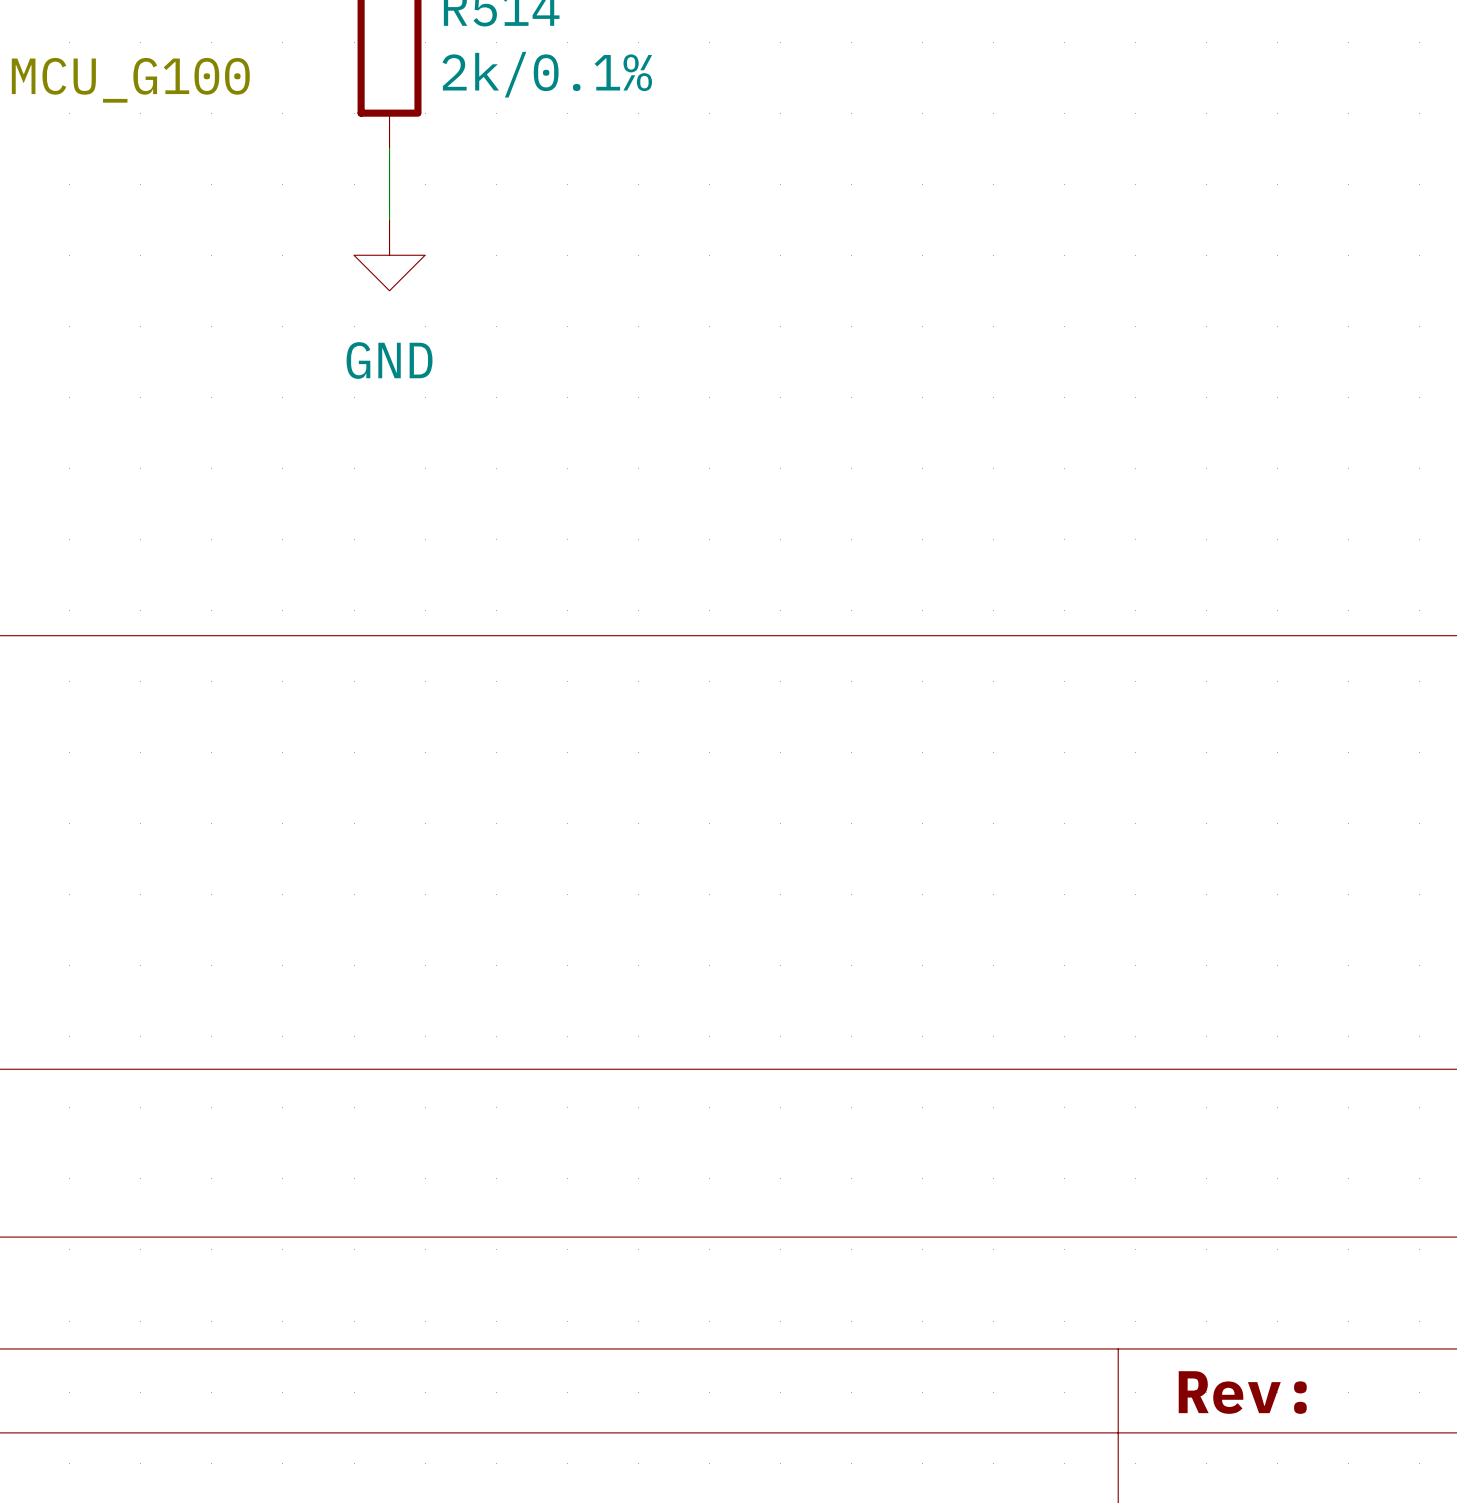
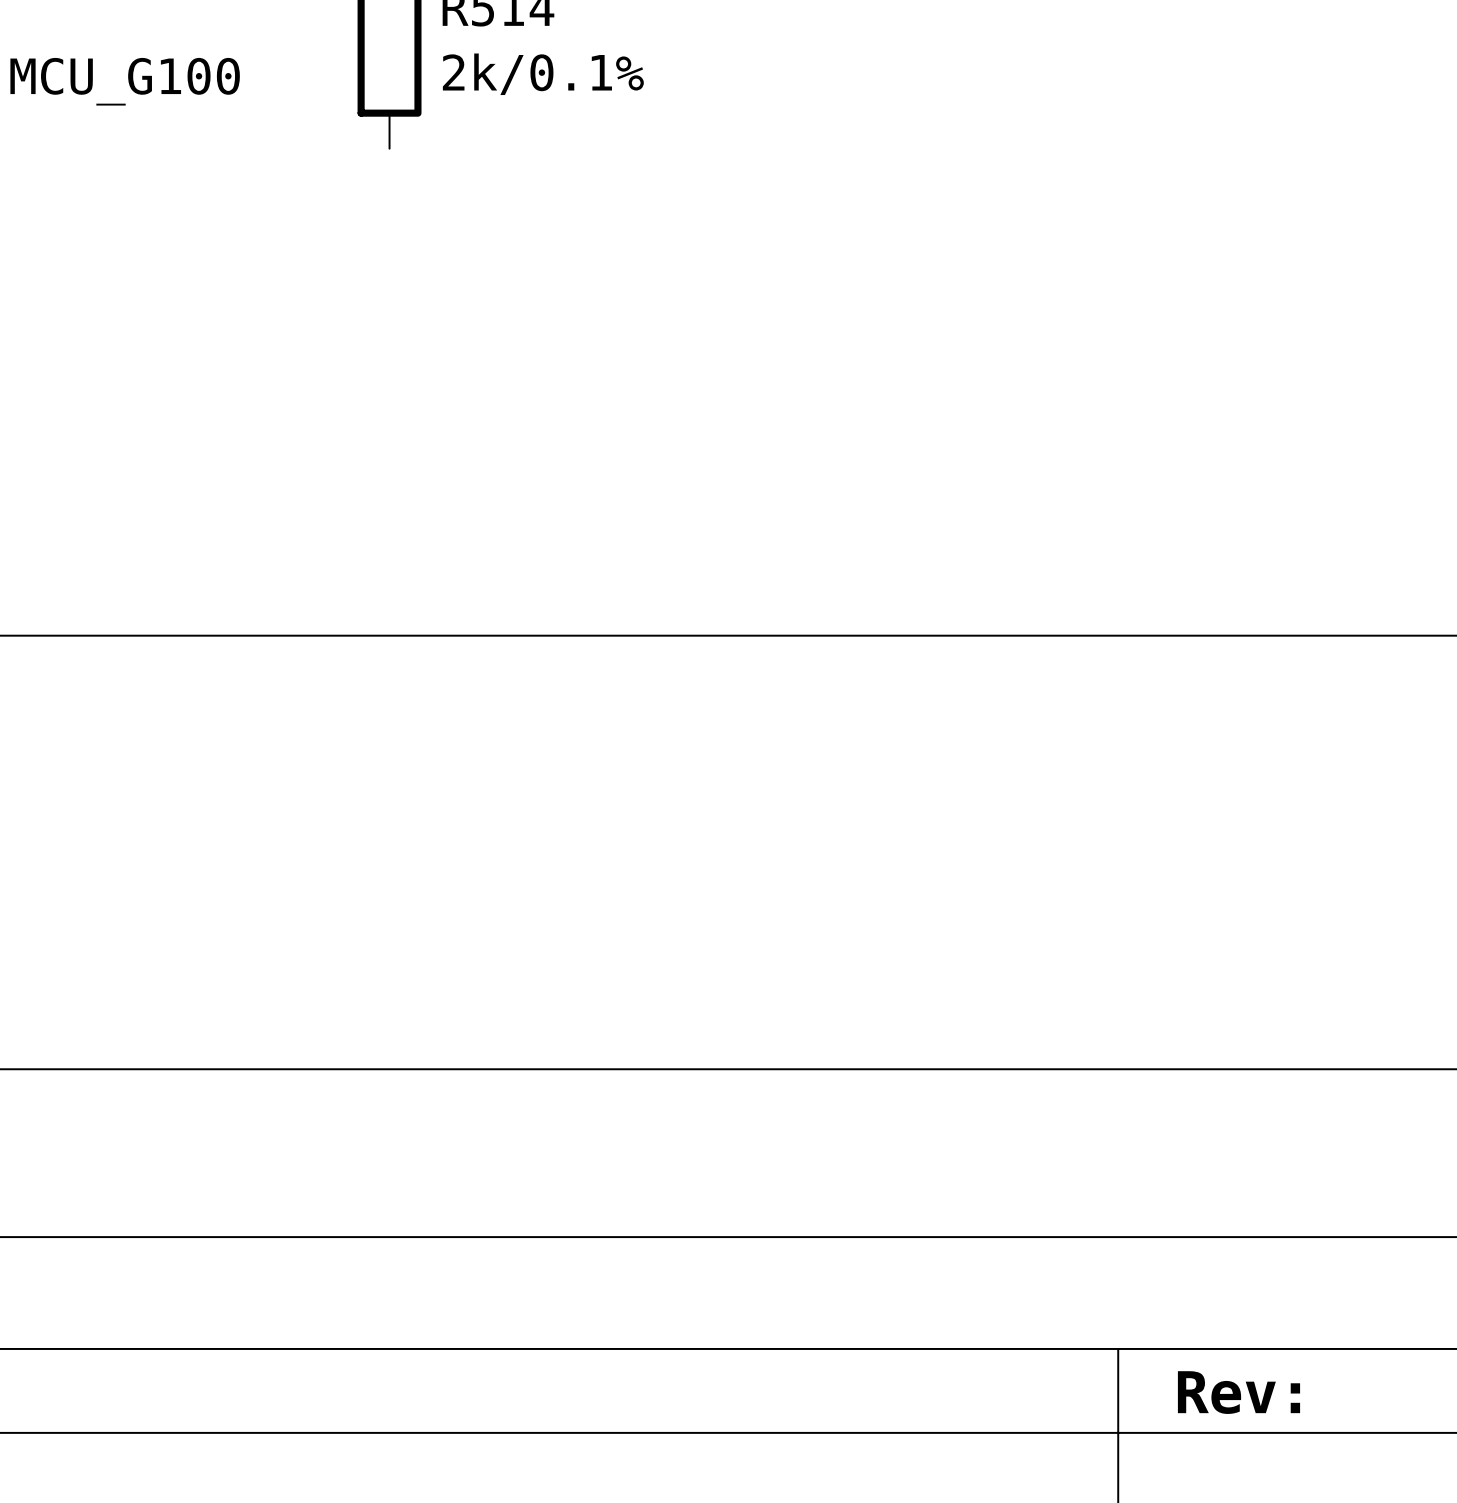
wire: (389, 148) (389, 219) -> none
power symbol: GND (389, 255) -> none

